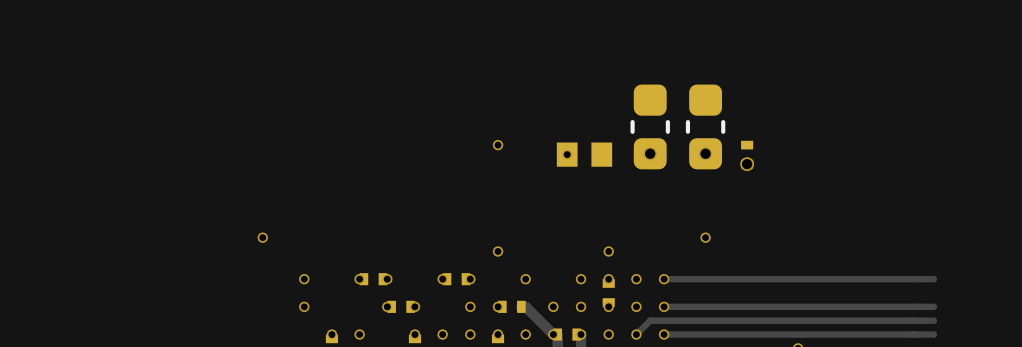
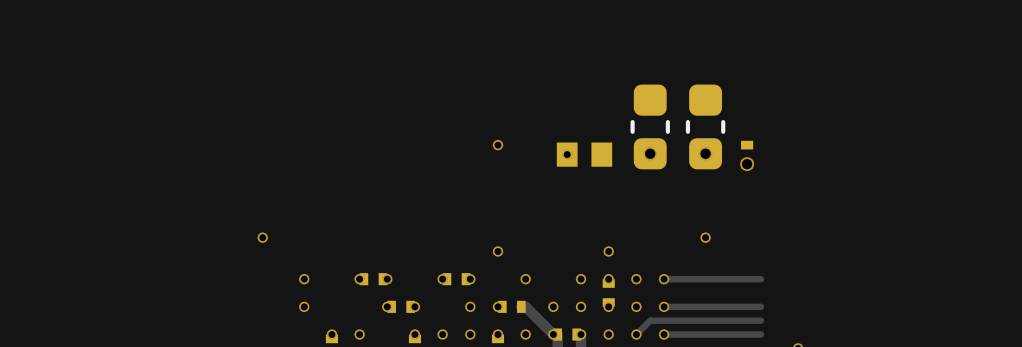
track: (933, 279) (760, 279) -> none
track: (933, 306) (760, 306) -> none
track: (933, 320) (760, 320) -> none
track: (933, 334) (760, 334) -> none

